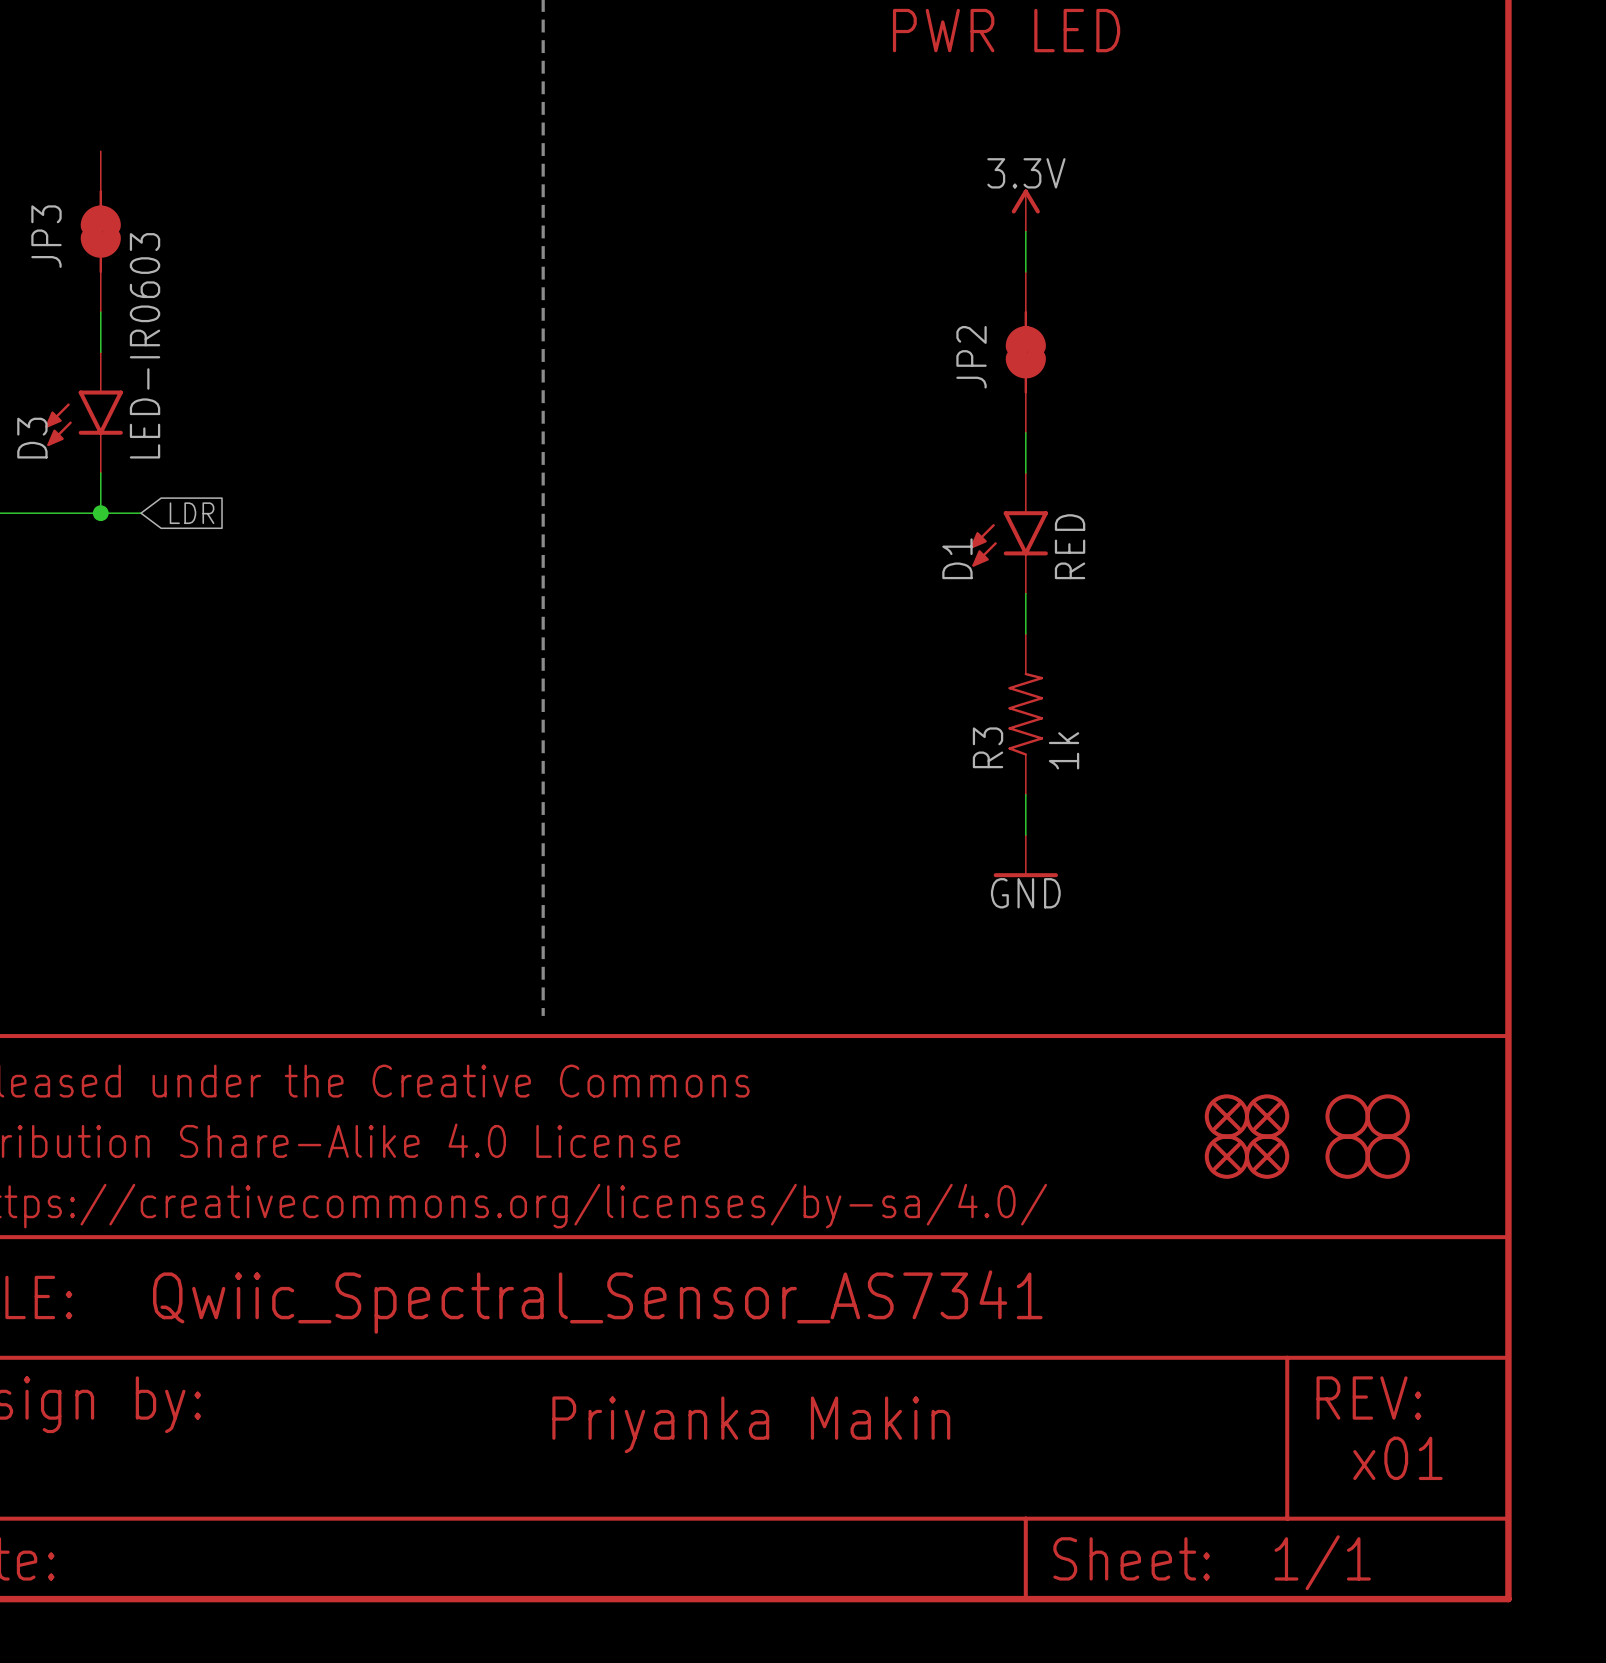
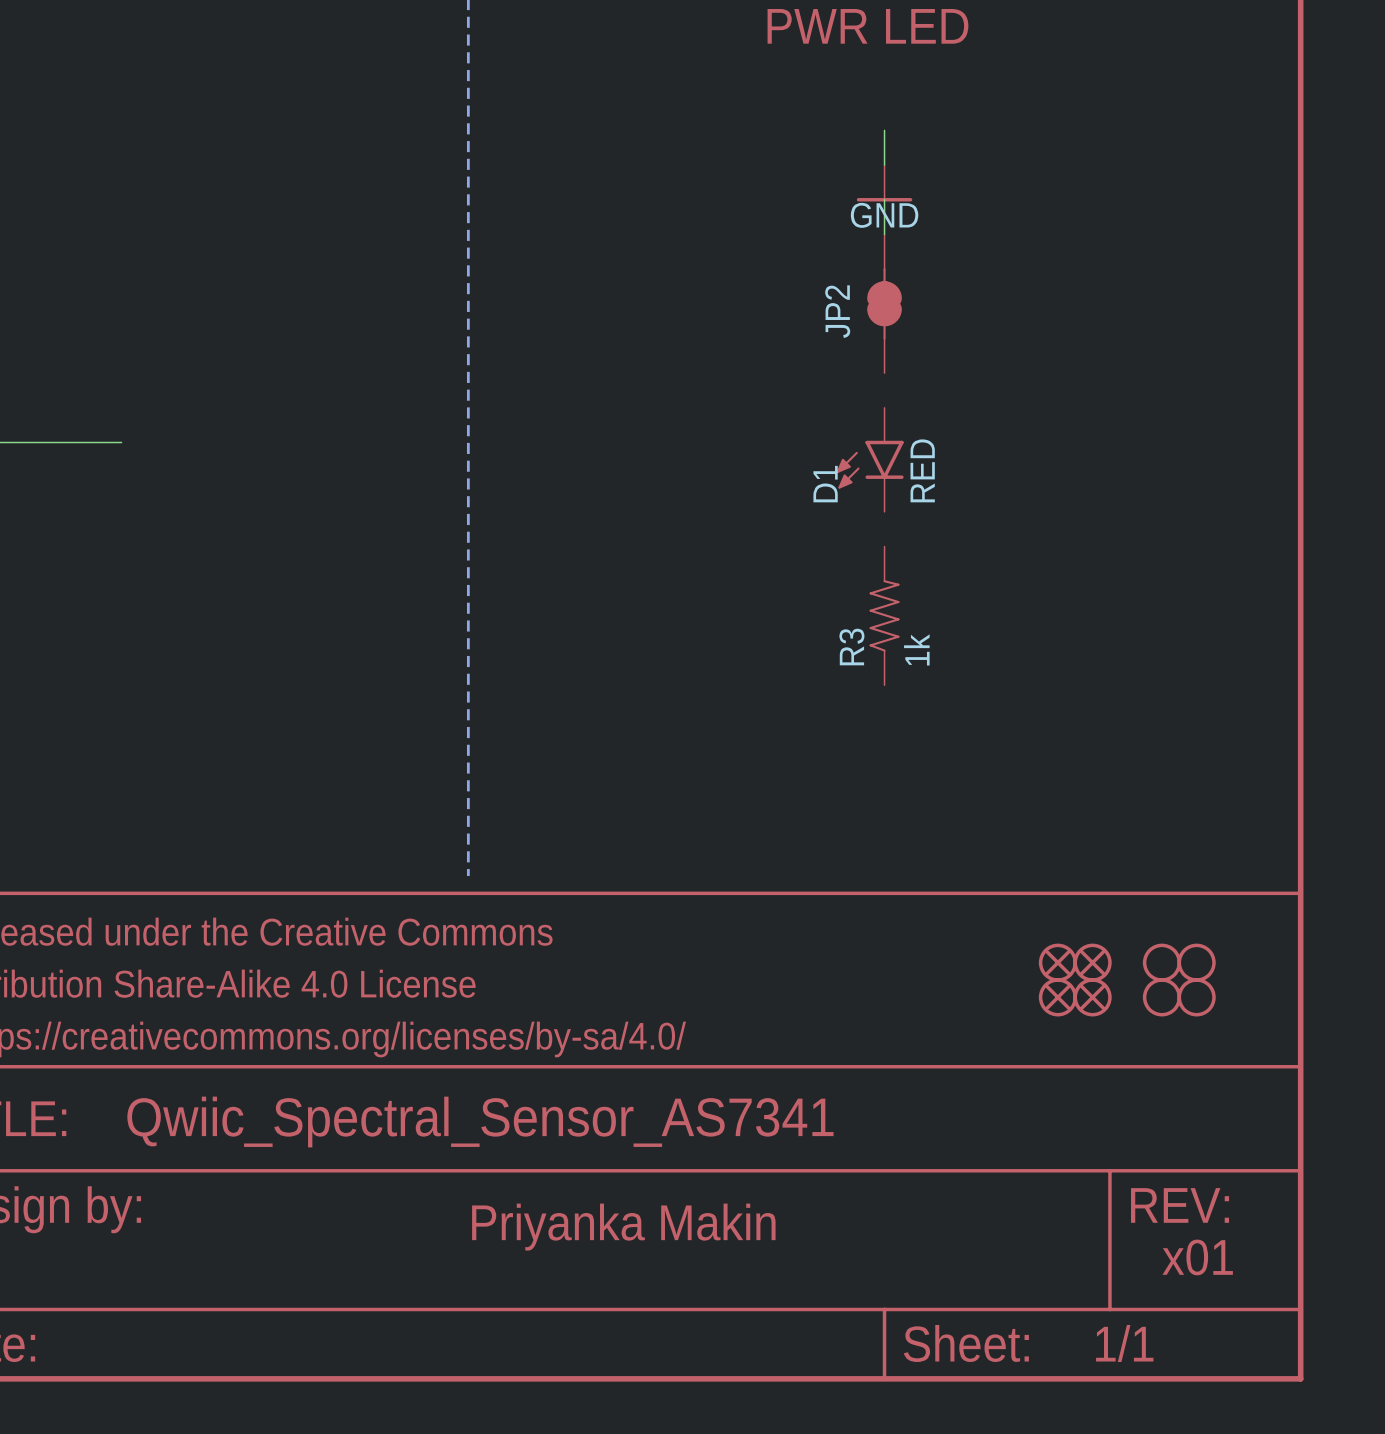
power symbol: 3.3V (1025, 210) -> GND (884, 183)
JP3: (100, 231) -> none
wire: (100, 312) (100, 352) -> none
D3: LED-IR0603 (84, 412) -> none
wire: (1025, 432) (1025, 472) -> (884, 130) (884, 165)
wire: (100, 472) (100, 513) -> none
junction: (100, 513) -> none
global label: LDR (192, 513) -> none
wire: (1025, 593) (1025, 633) -> none
wire: (1025, 794) (1025, 834) -> none
power symbol: GND (1025, 856) -> none

